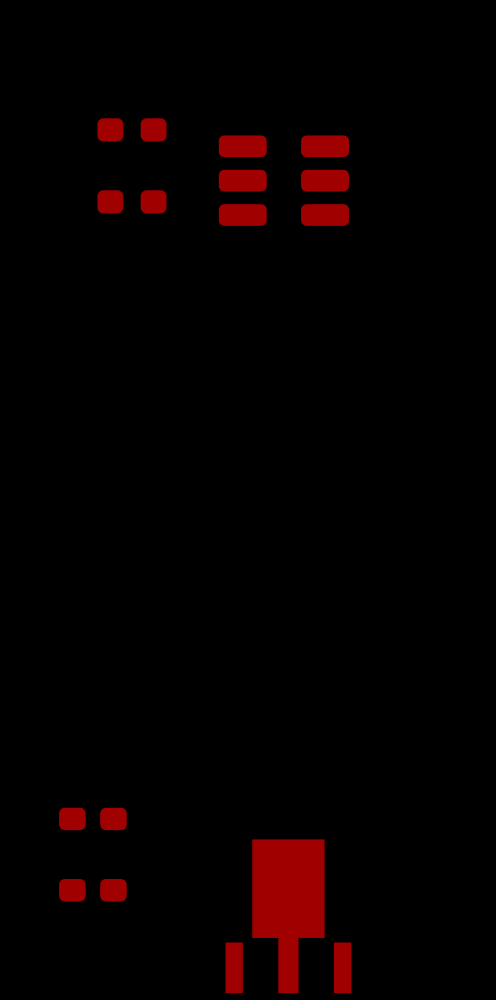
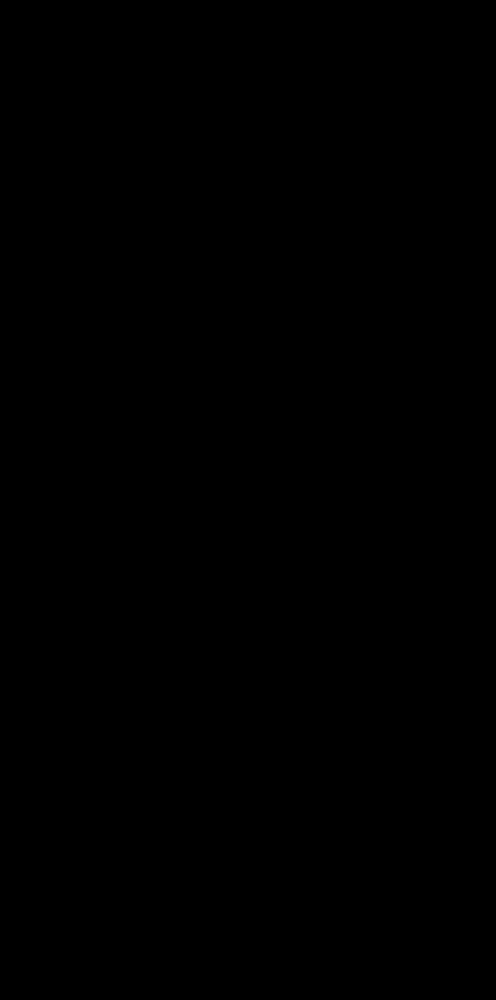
part: (131, 129) -> none
part: (283, 180) -> none
part: (131, 201) -> none
part: (92, 818) -> none
part: (92, 890) -> none
part: (288, 916) -> none

